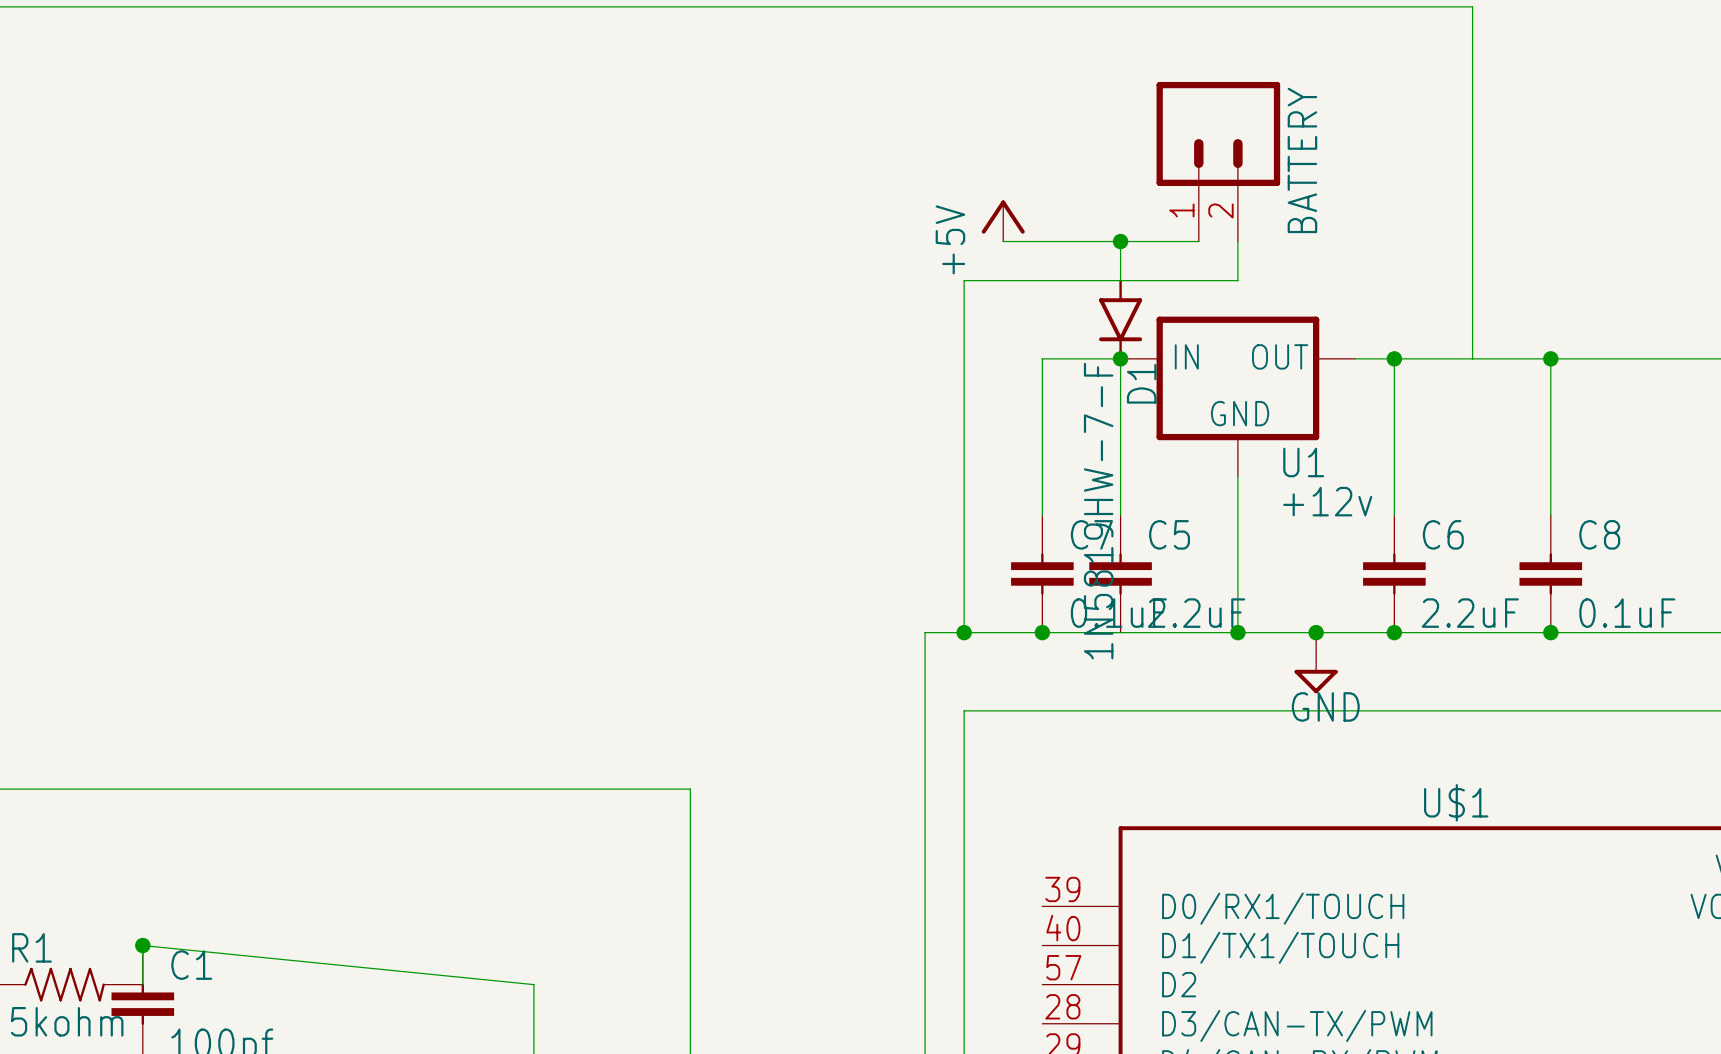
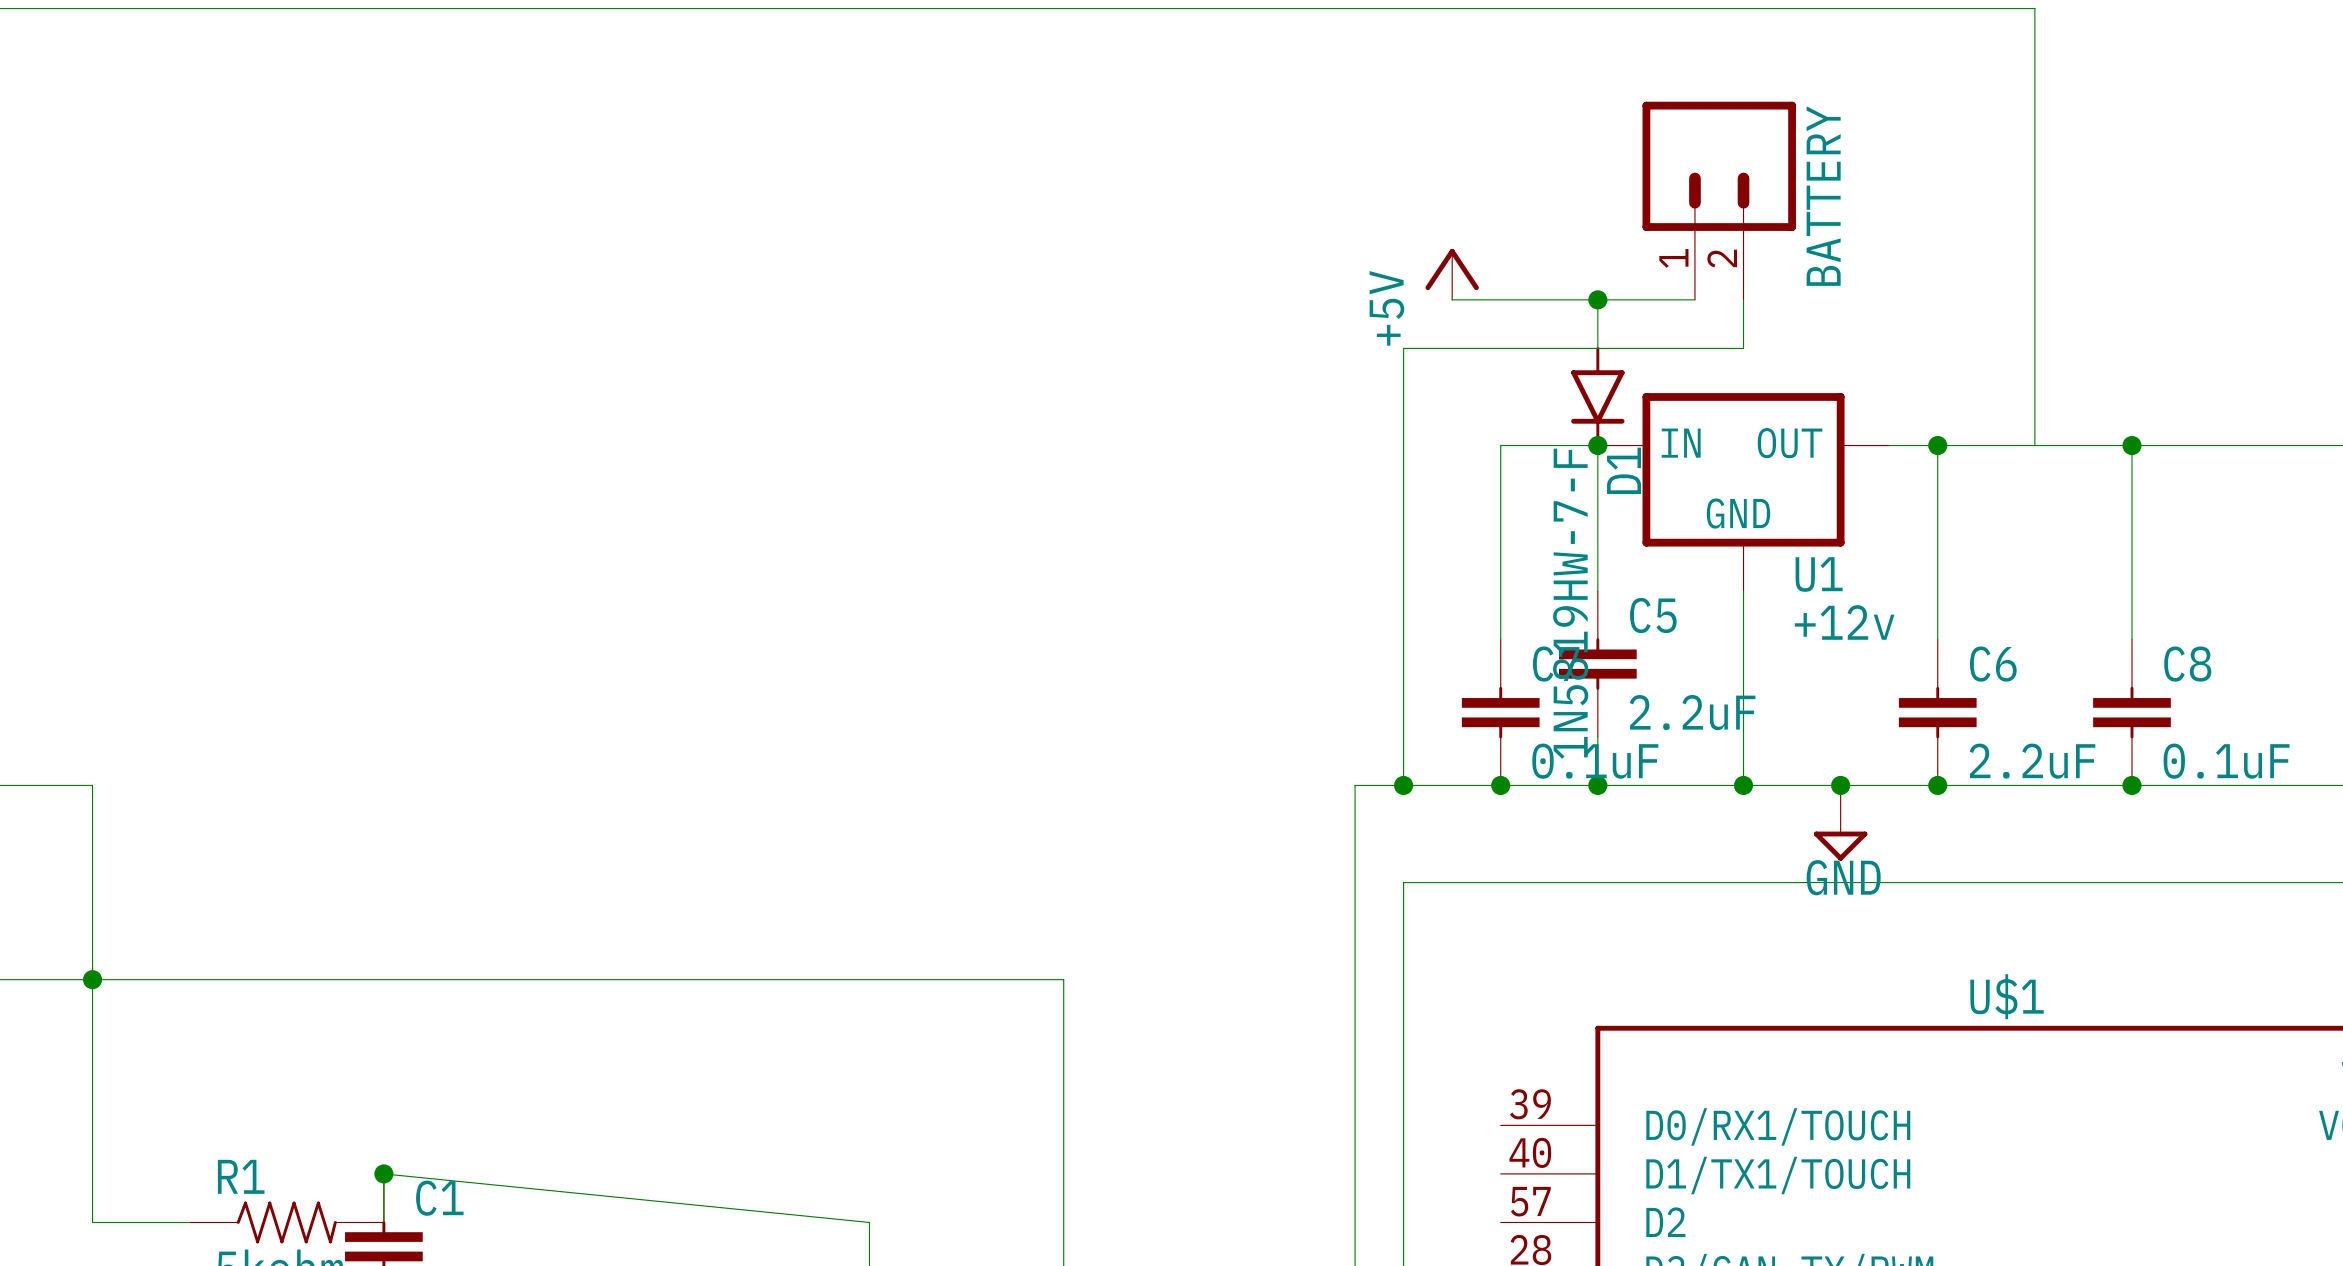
C5 position: (1120, 573) -> (1597, 664)
junction: none -> (1597, 785)

